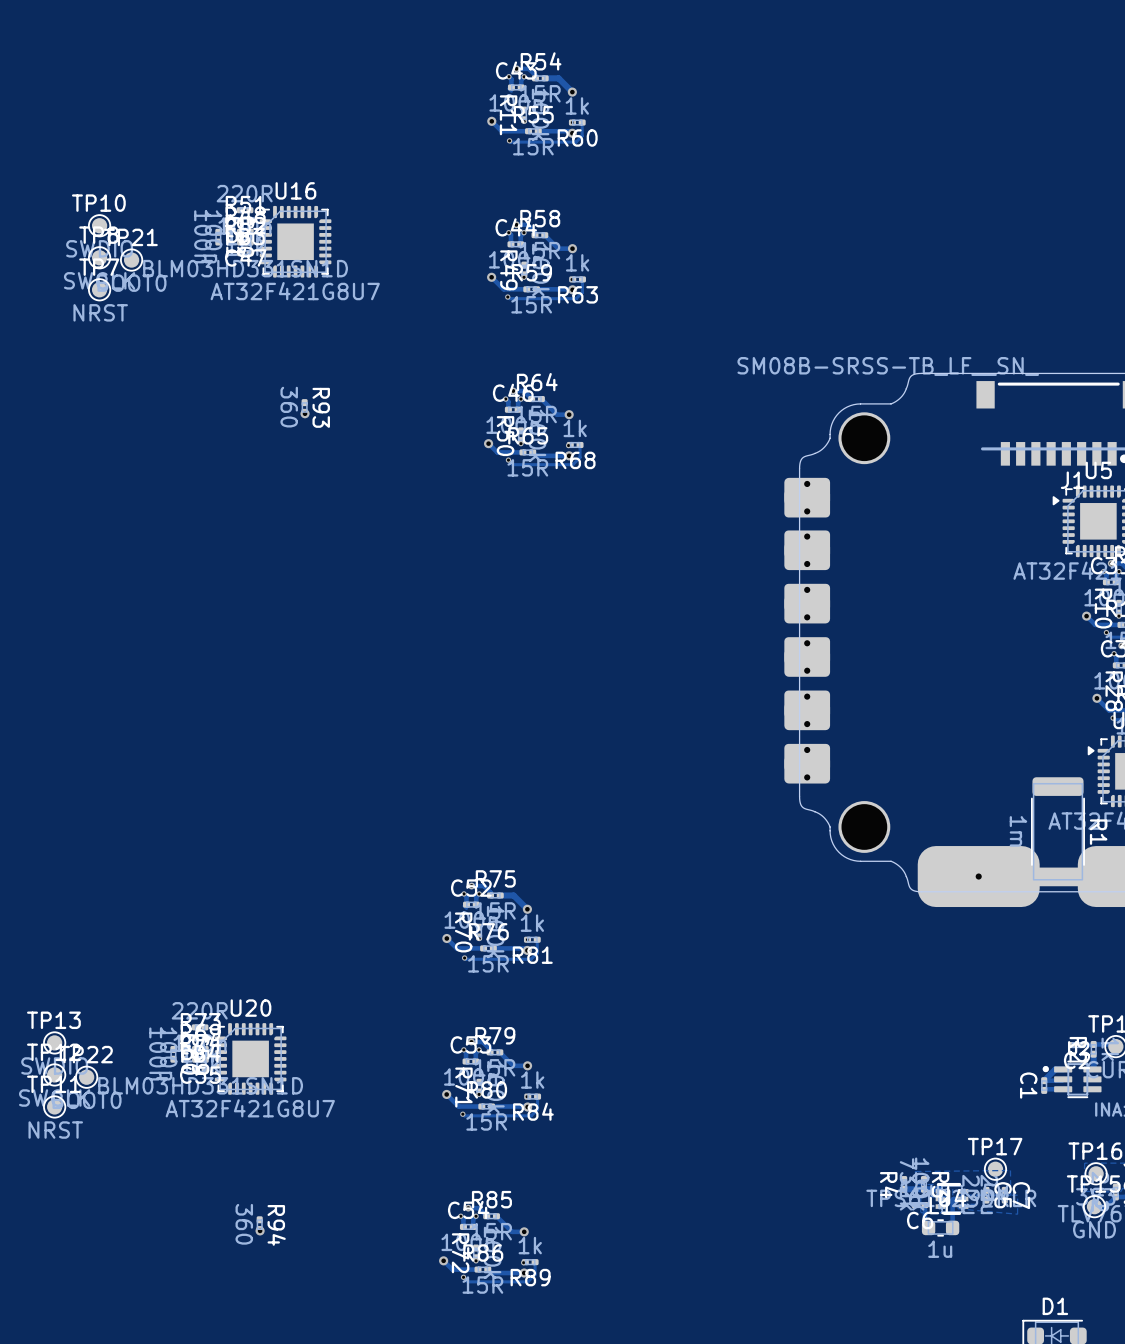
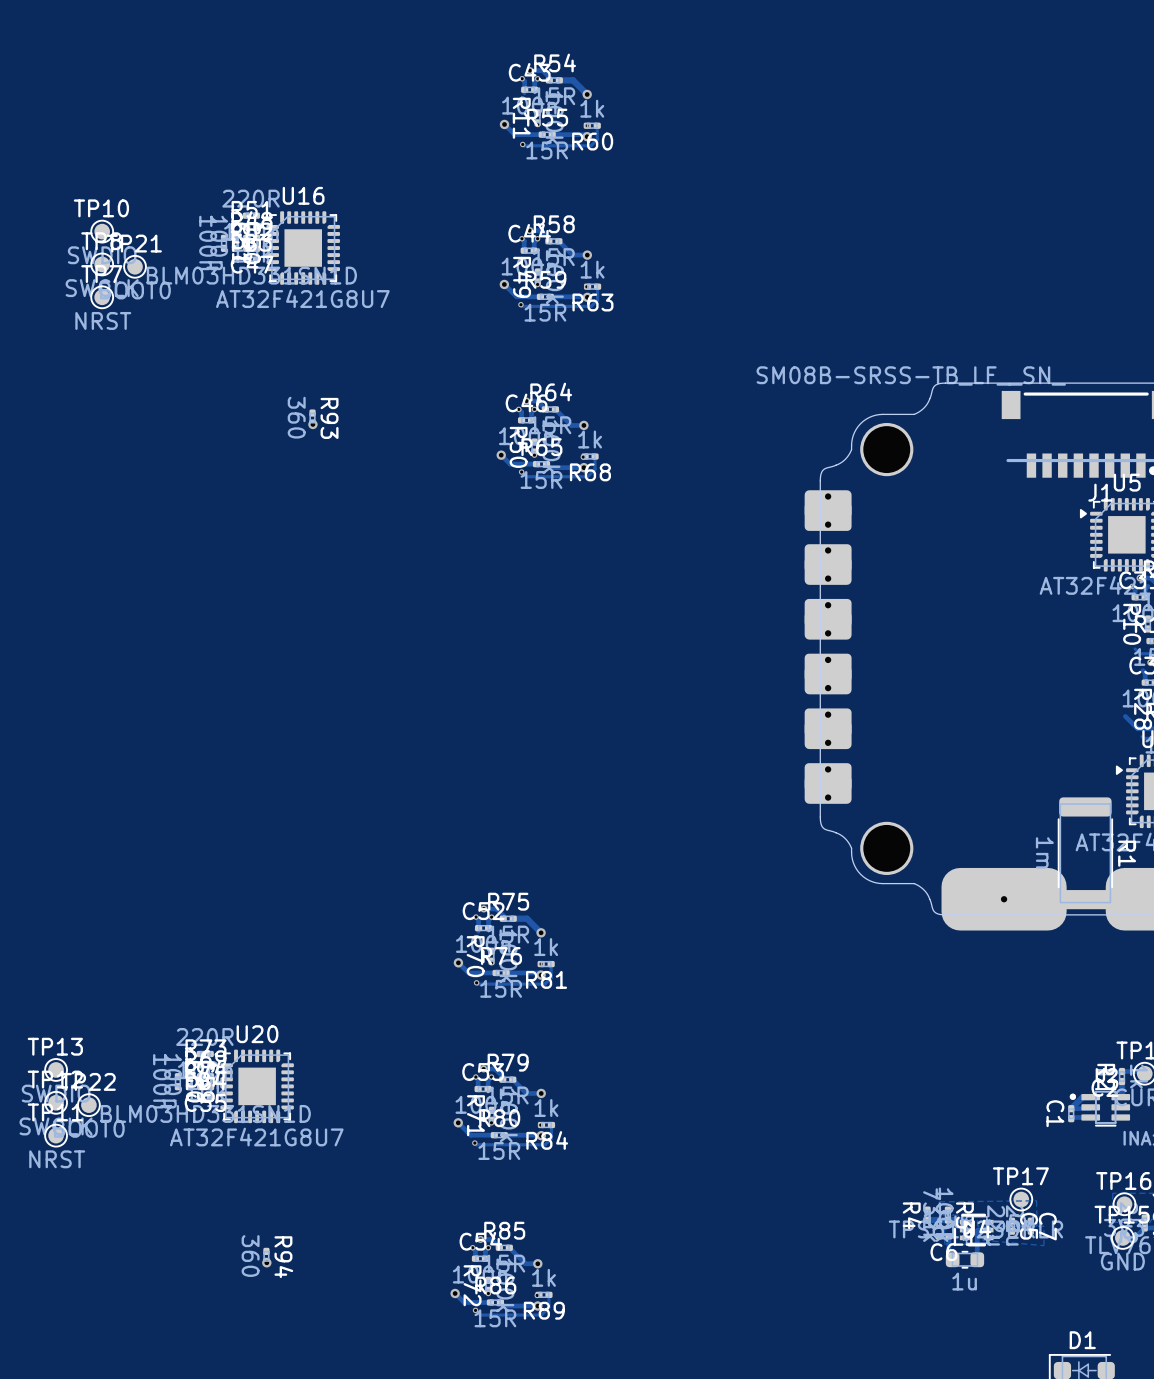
via: (1118, 571) -> none
track: (1086, 616) (1095, 624) (1120, 624) -> none
via: (1086, 616) -> none
via: (1118, 616) -> none
via: (1106, 632) -> none
via: (1114, 653) -> none
via: (1096, 698) -> none
via: (1113, 718) -> none

